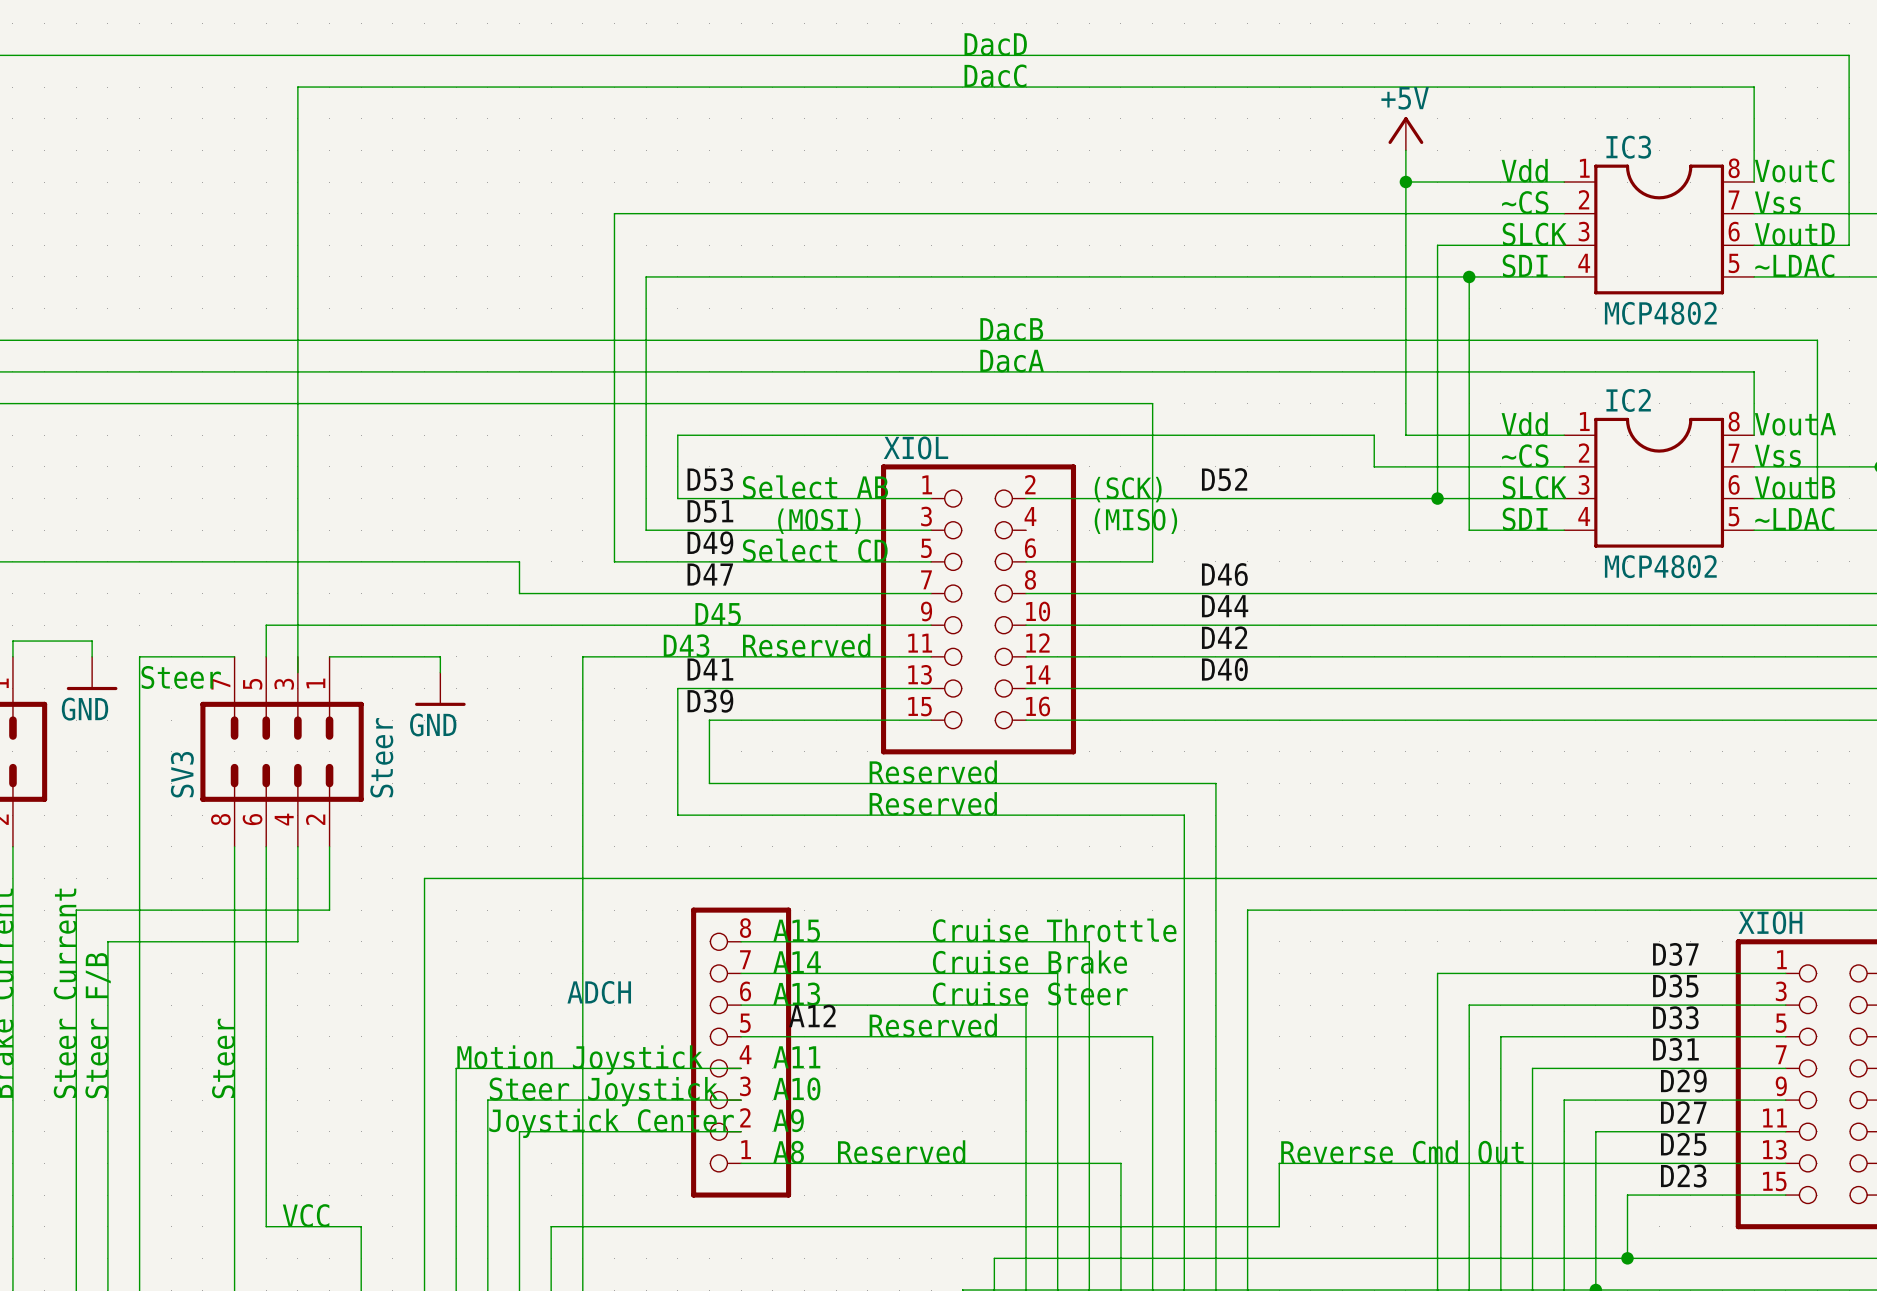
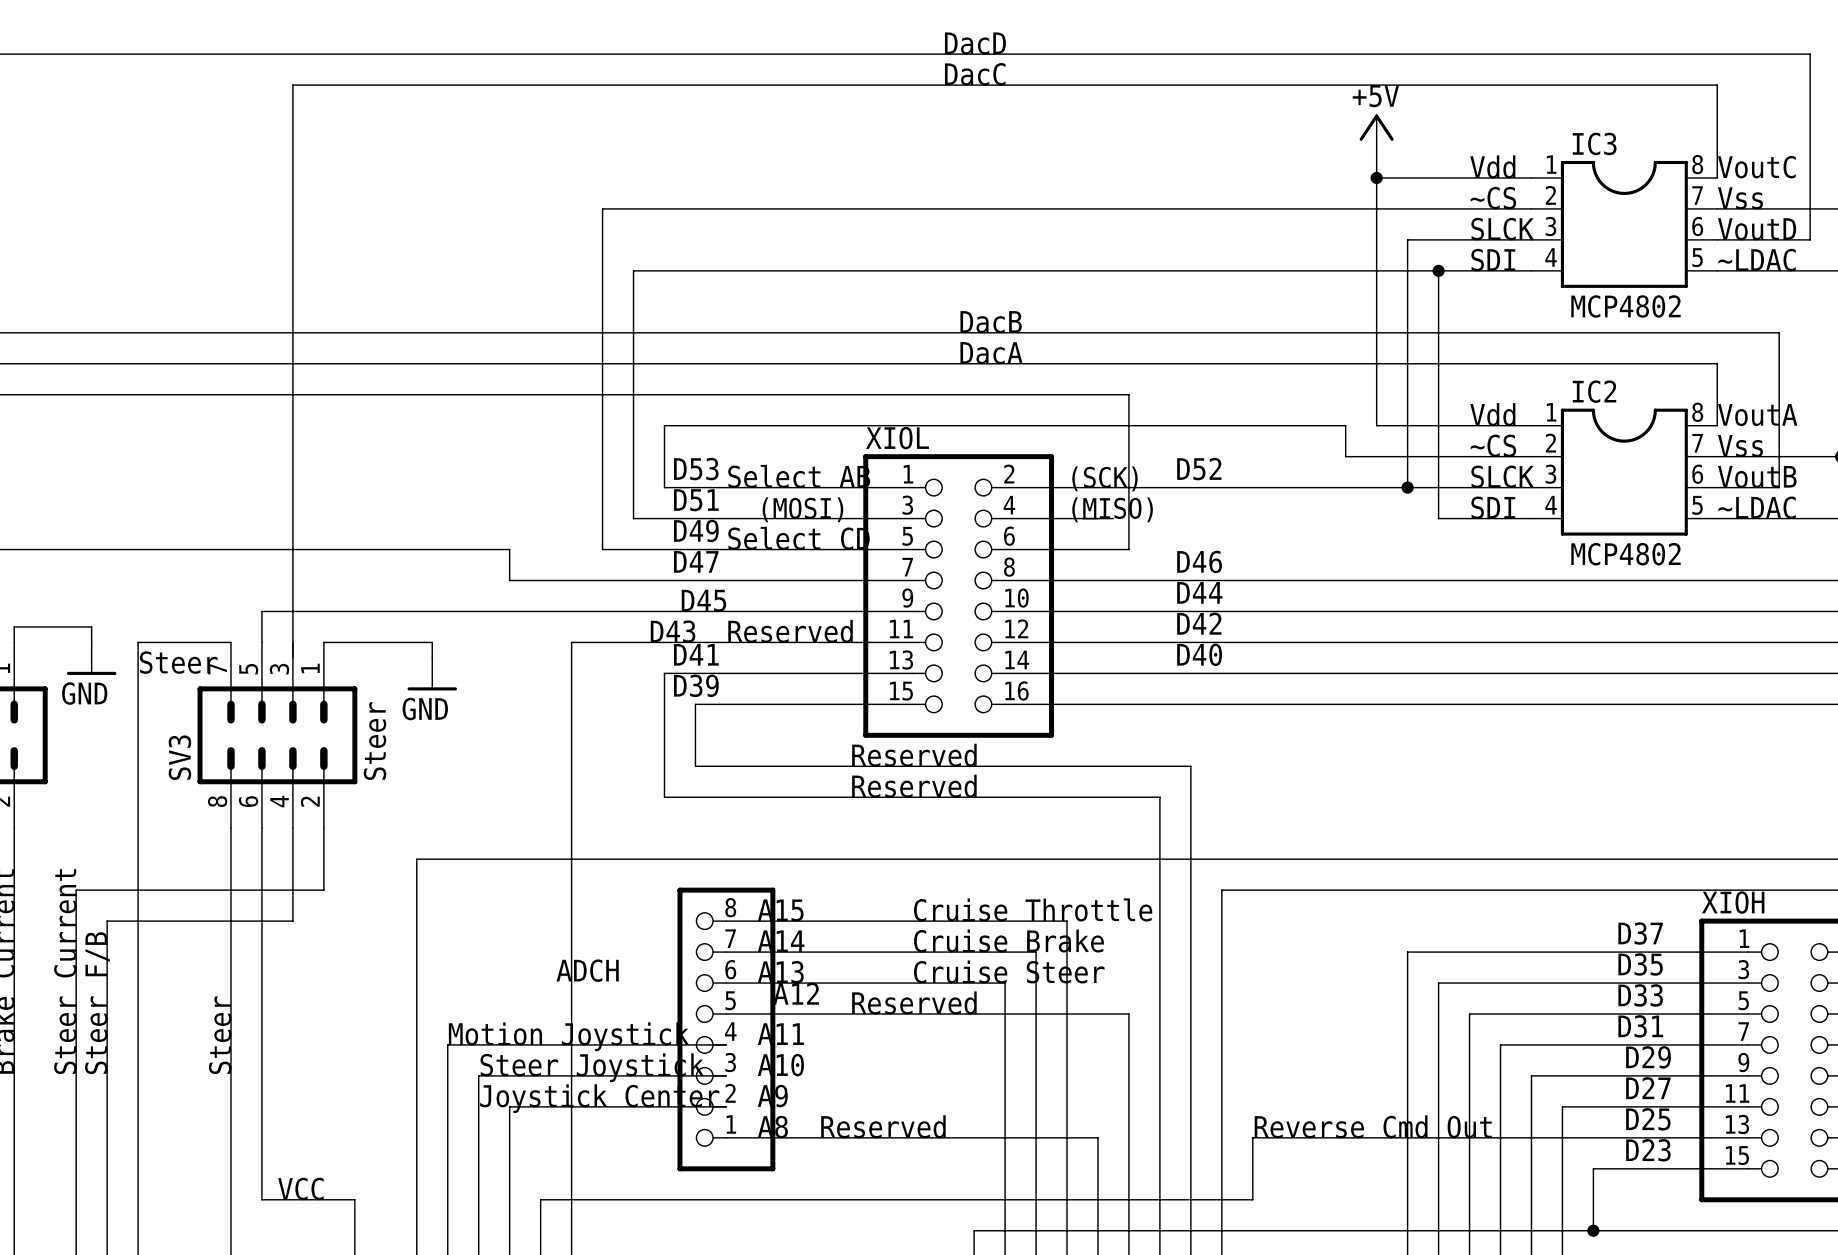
wire: none -> (1005, 518) (1113, 518)

